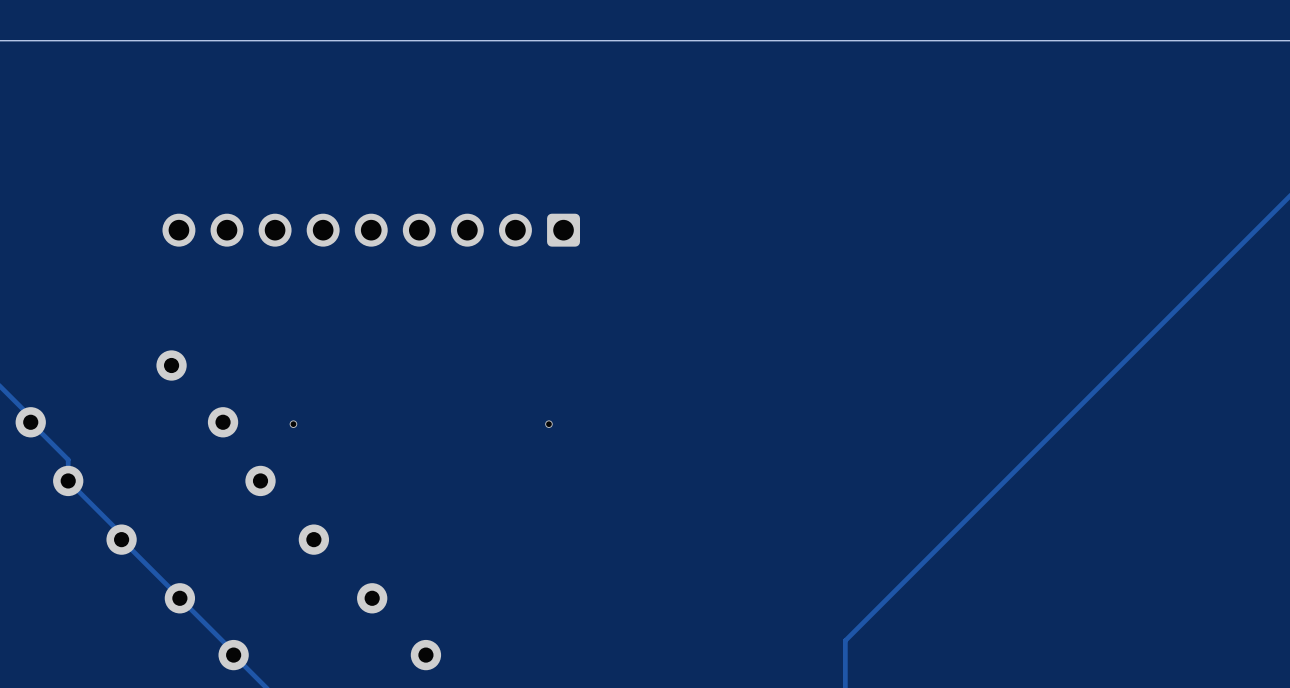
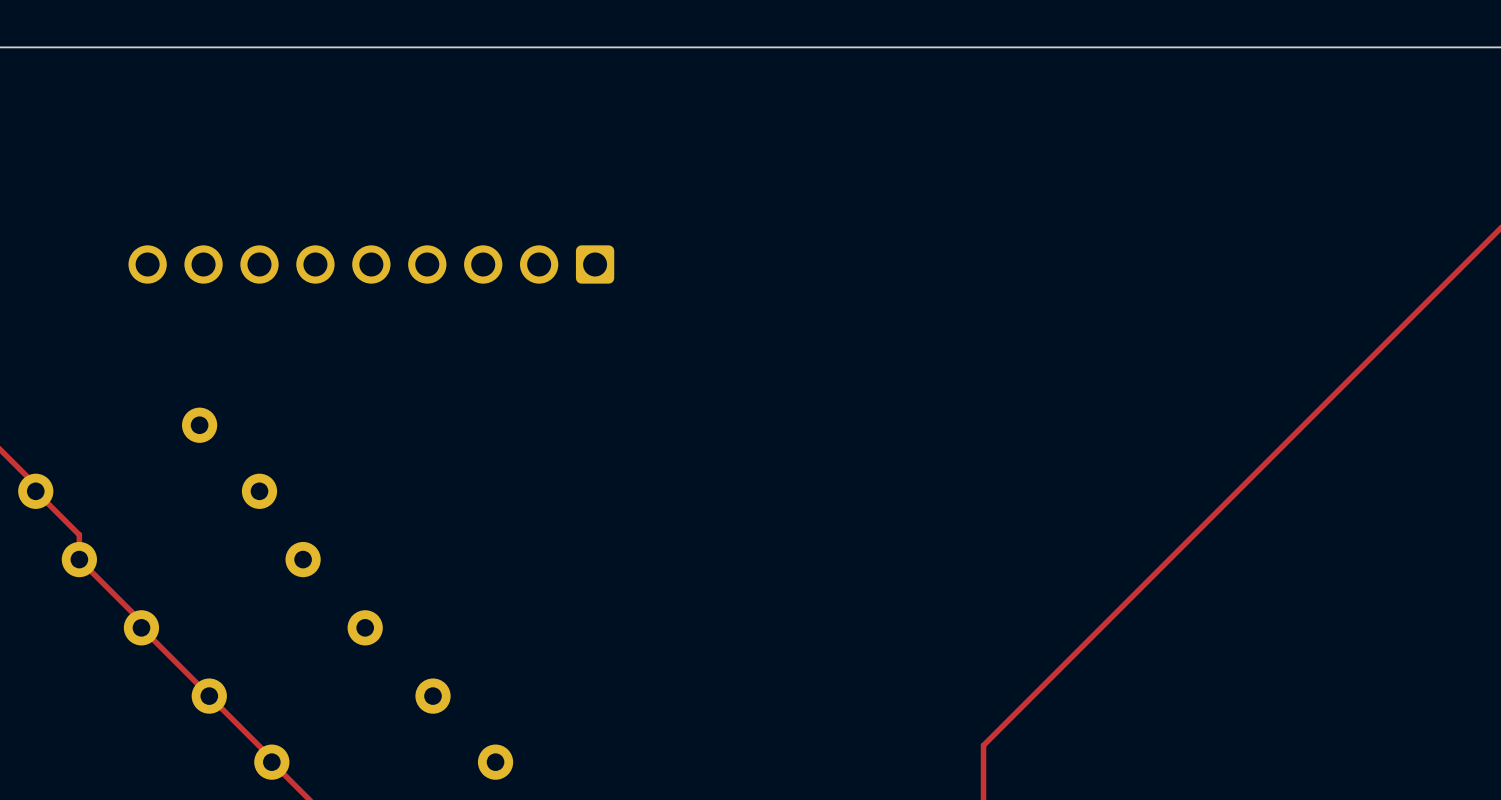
part position: (371, 230) -> (371, 264)
via: (293, 424) -> none
via: (548, 424) -> none

